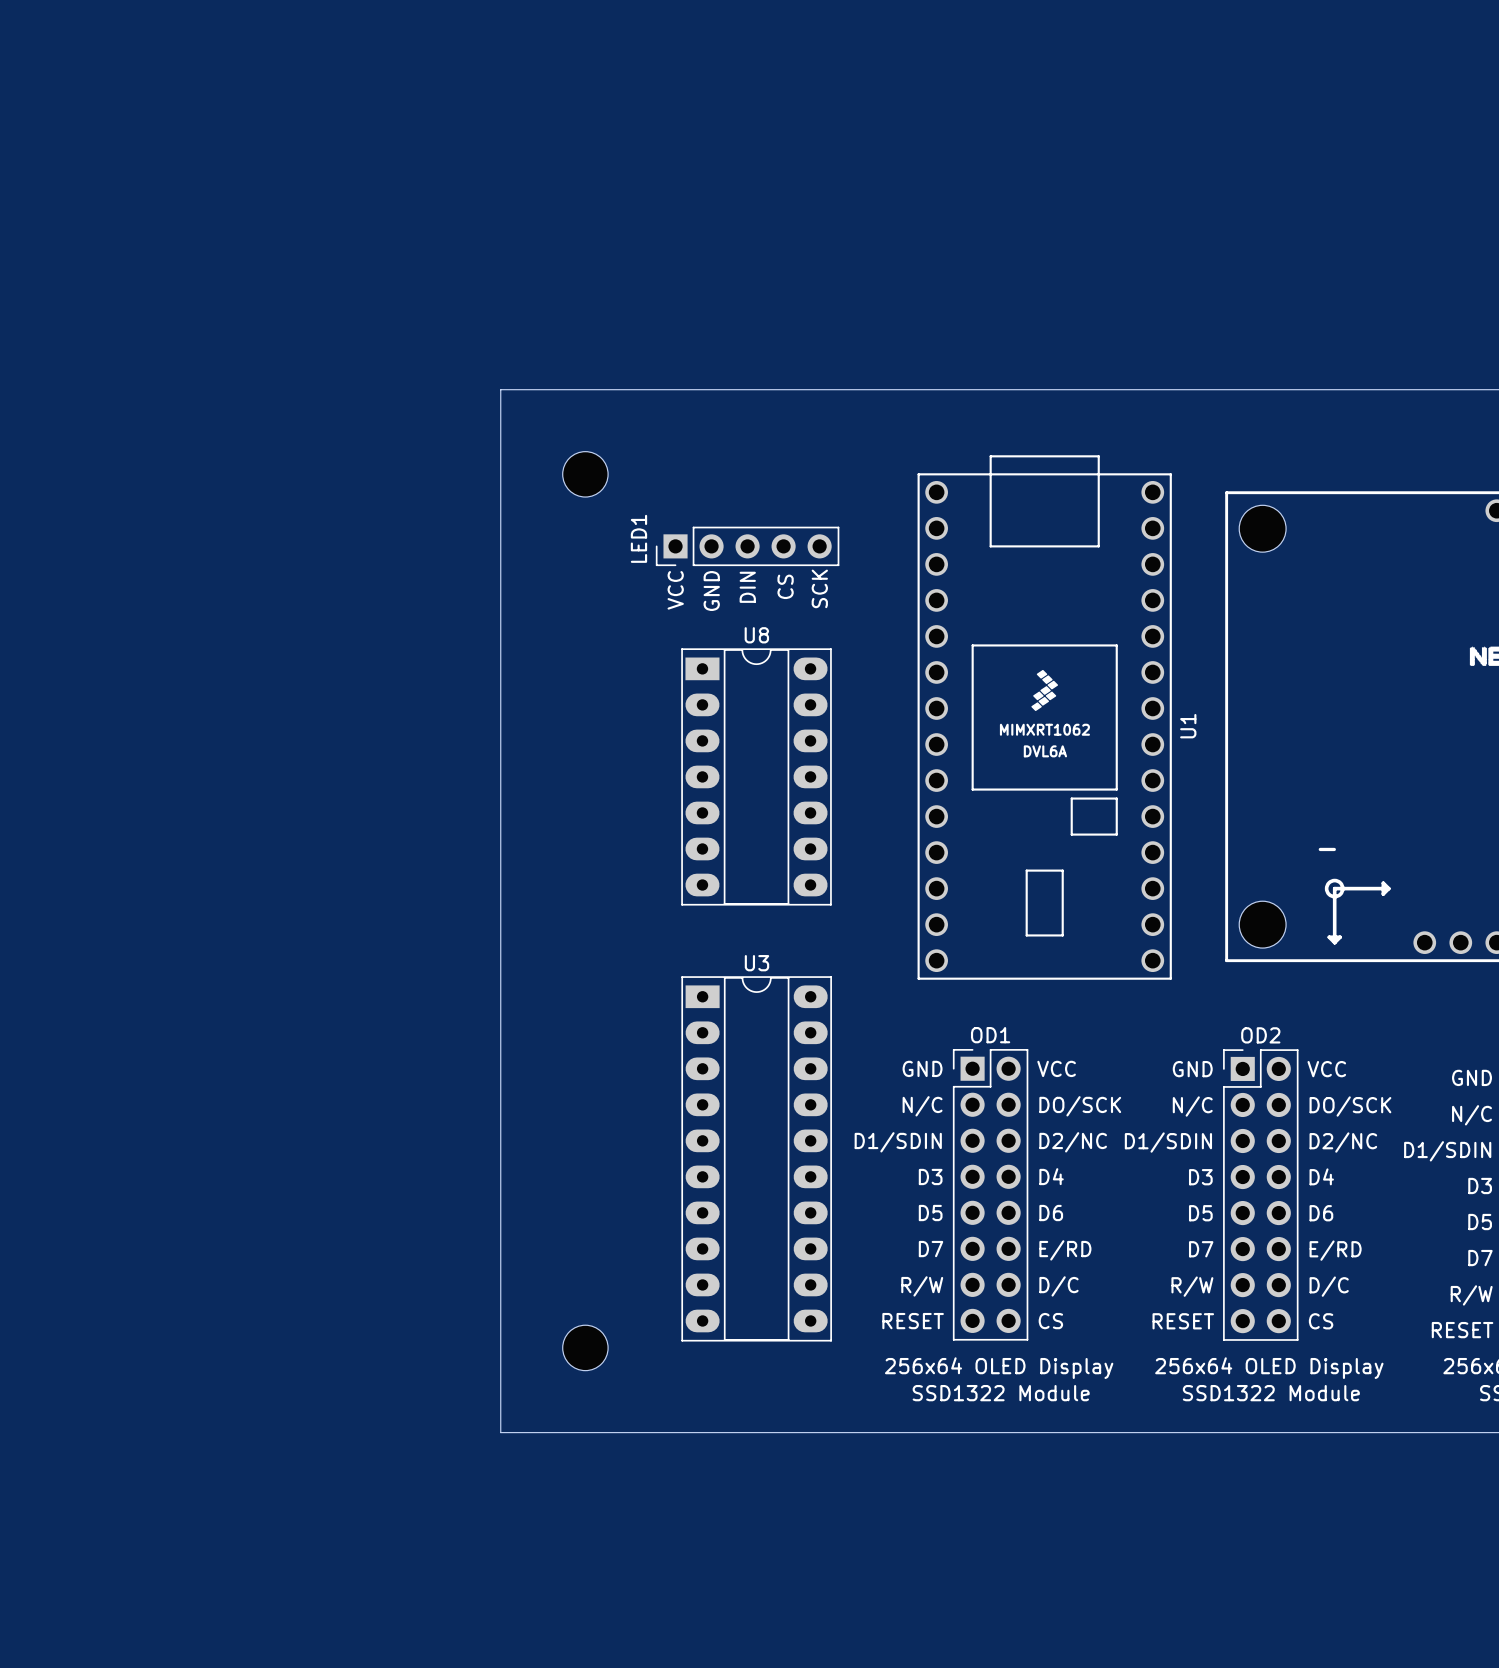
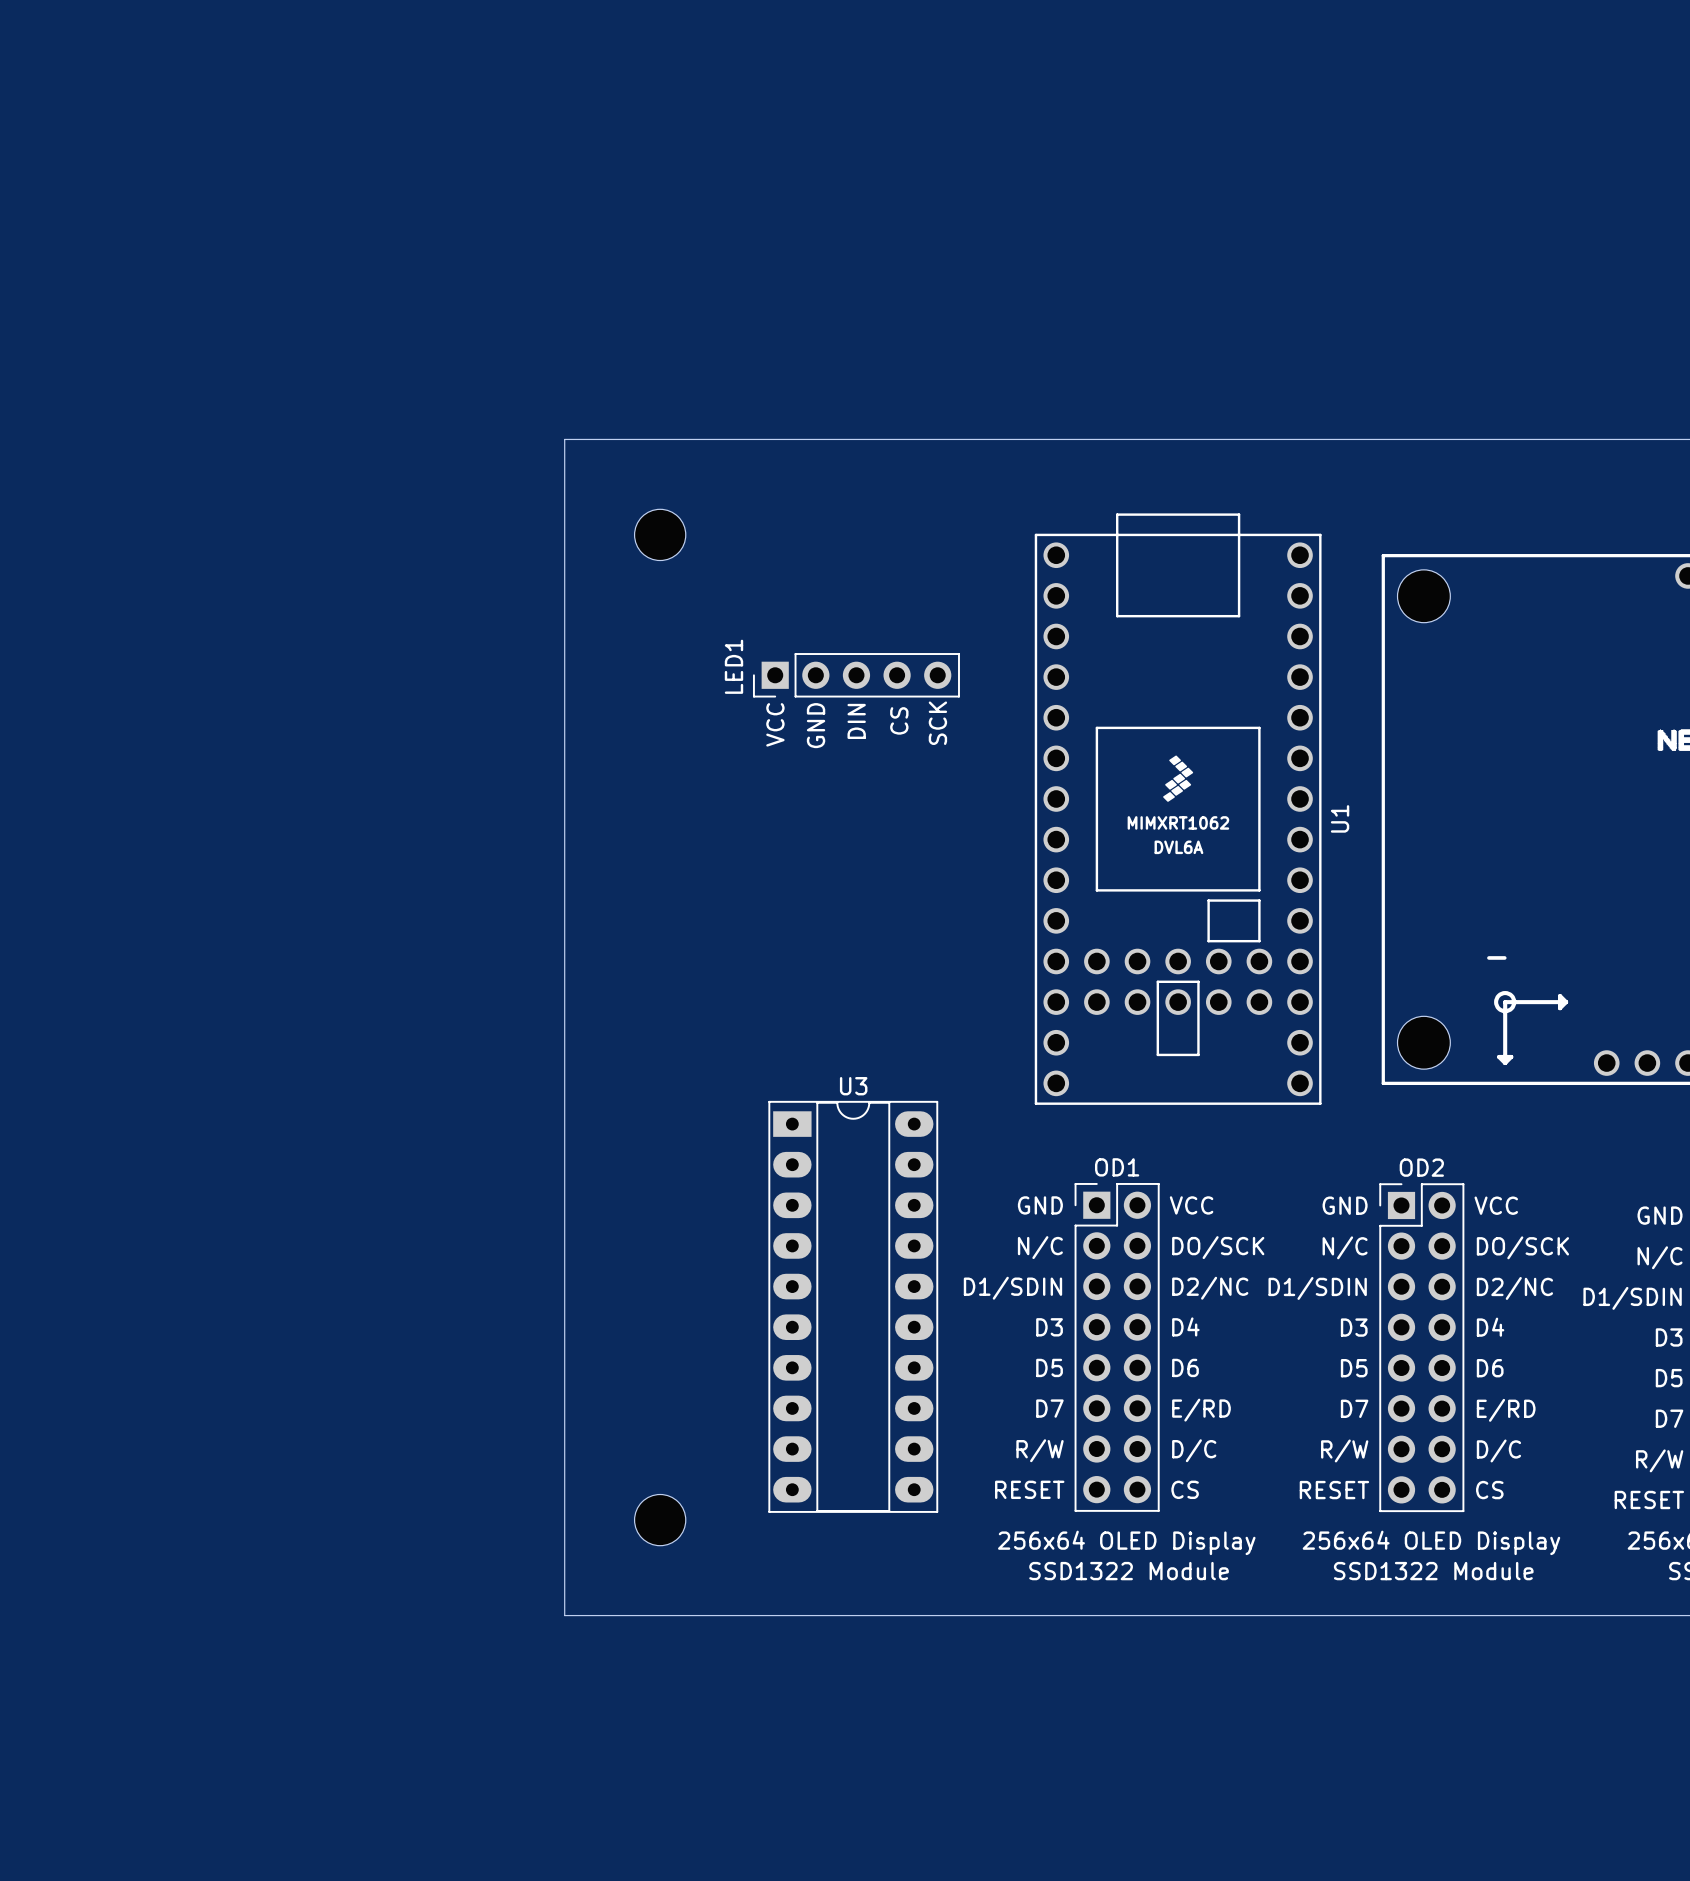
U1 footprint: [917, 455, 1172, 980] -> [1034, 513, 1322, 1105]
LED1 position: (747, 546) -> (856, 675)
U8: (756, 776) -> none

